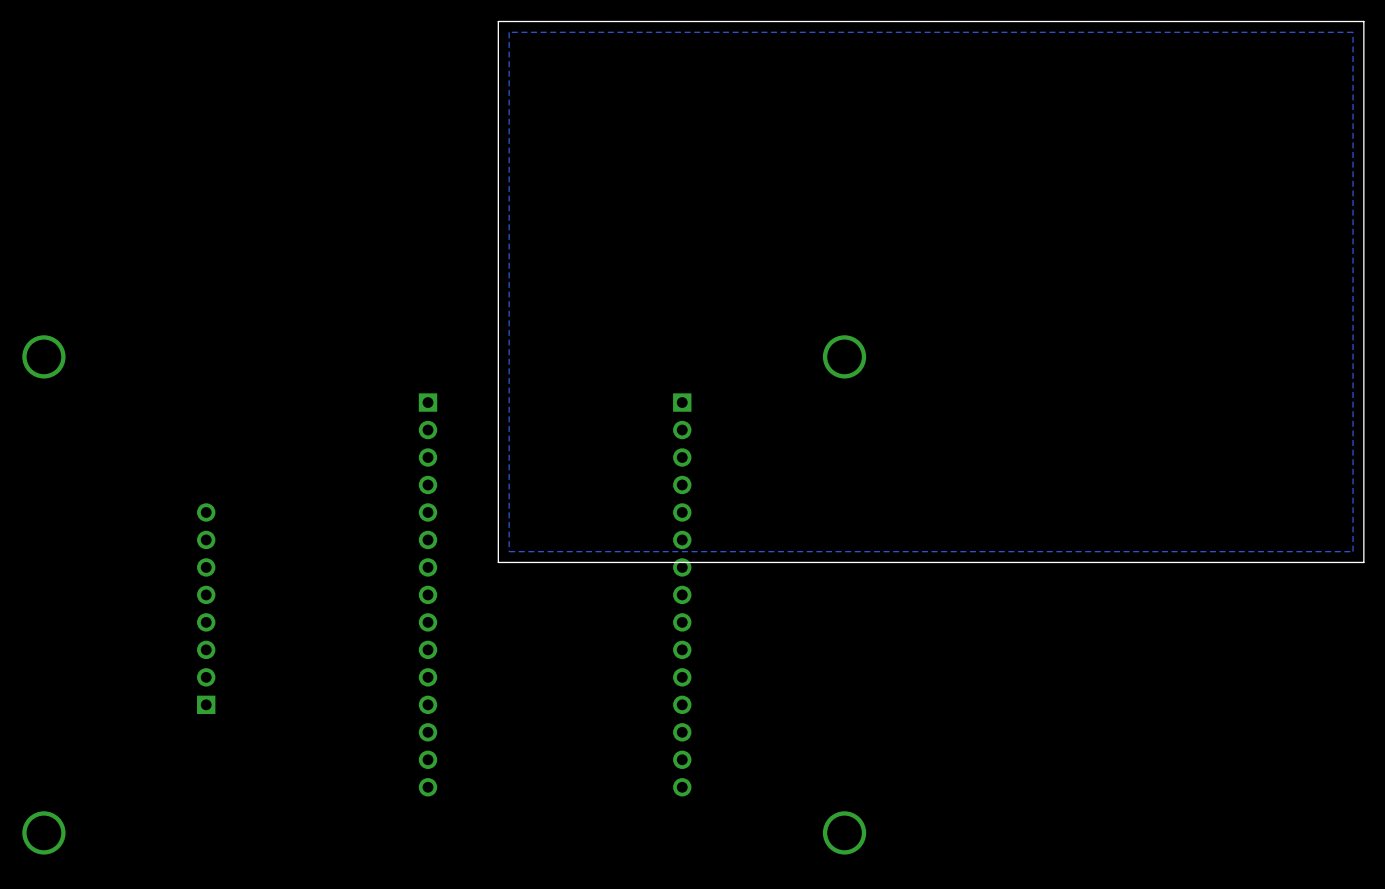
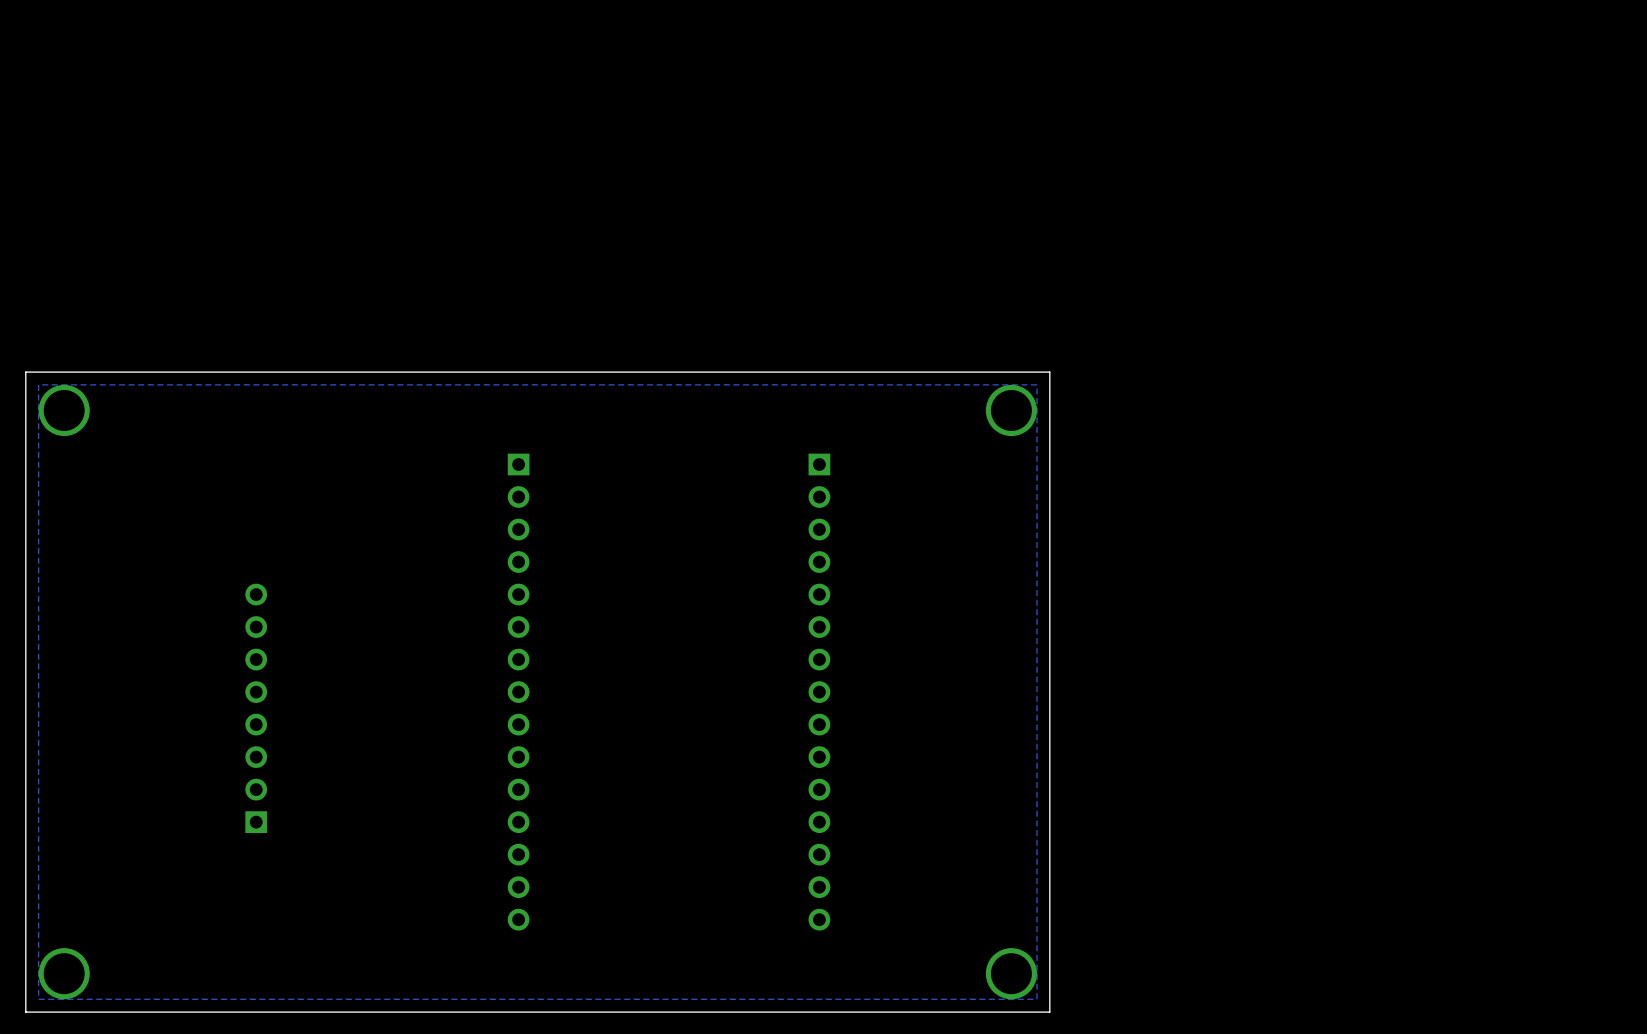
board edge: (1363, 21) (498, 21) (498, 562) (1363, 562) (1363, 21) -> none
bottom zone outline: (1353, 32) (509, 32) (509, 551) (1353, 551) (1353, 32) -> none
board edge: none -> (1049, 372) (25, 372) (25, 1012) (1049, 1012) (1049, 372)
bottom zone outline: none -> (1037, 384) (38, 384) (38, 999) (1037, 999) (1037, 384)

